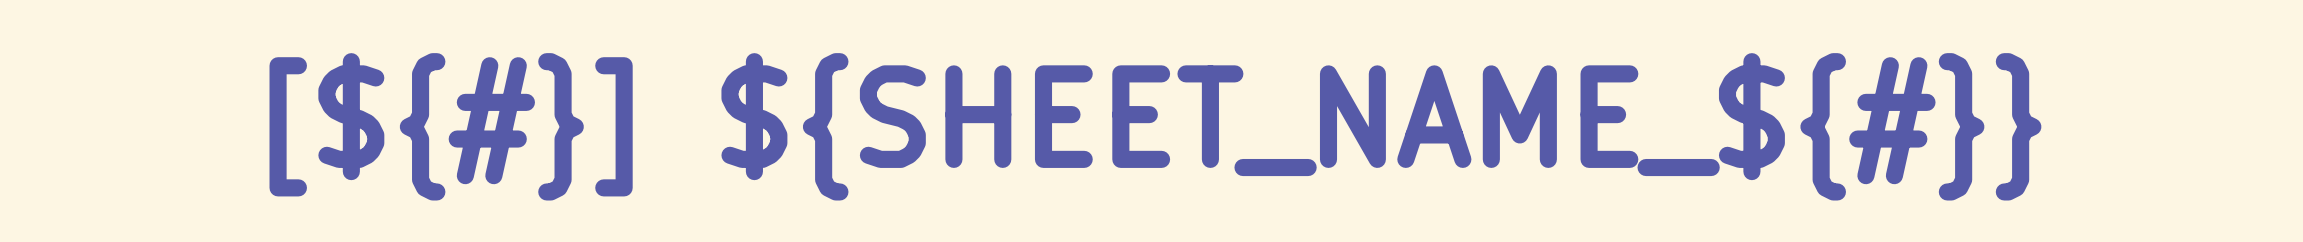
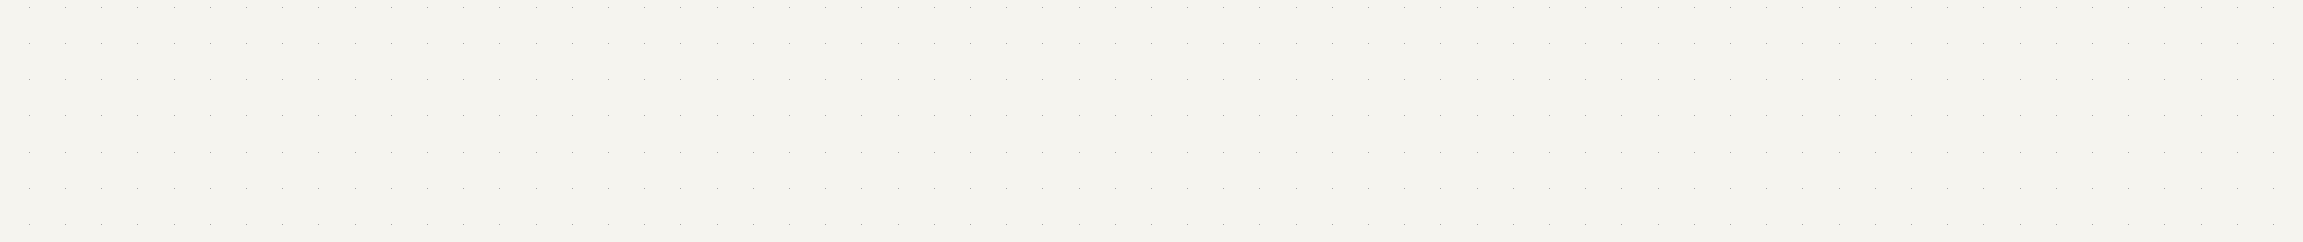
text: [${#}] ${SHEET_NAME_${#}} (1155, 126) -> none

